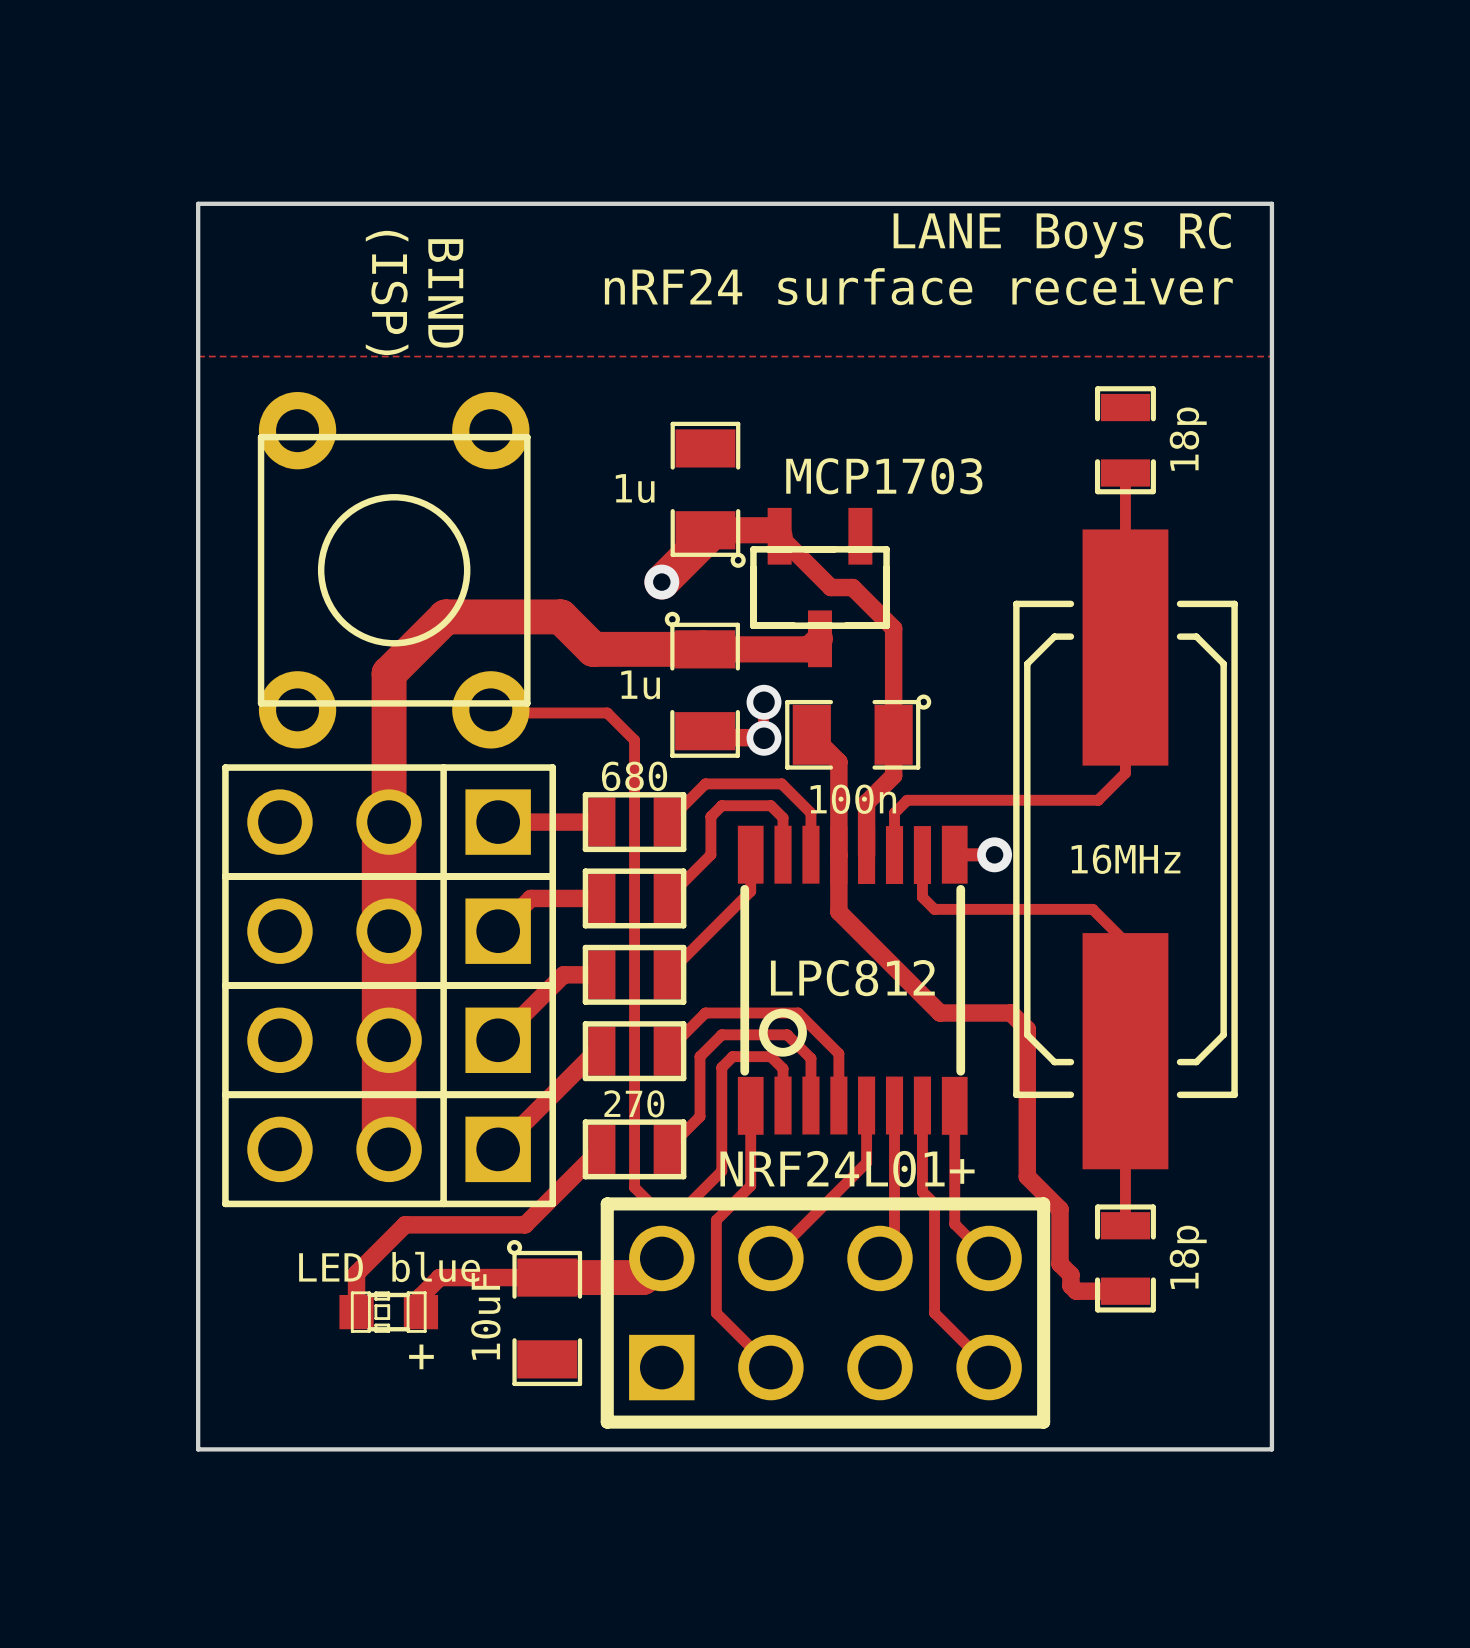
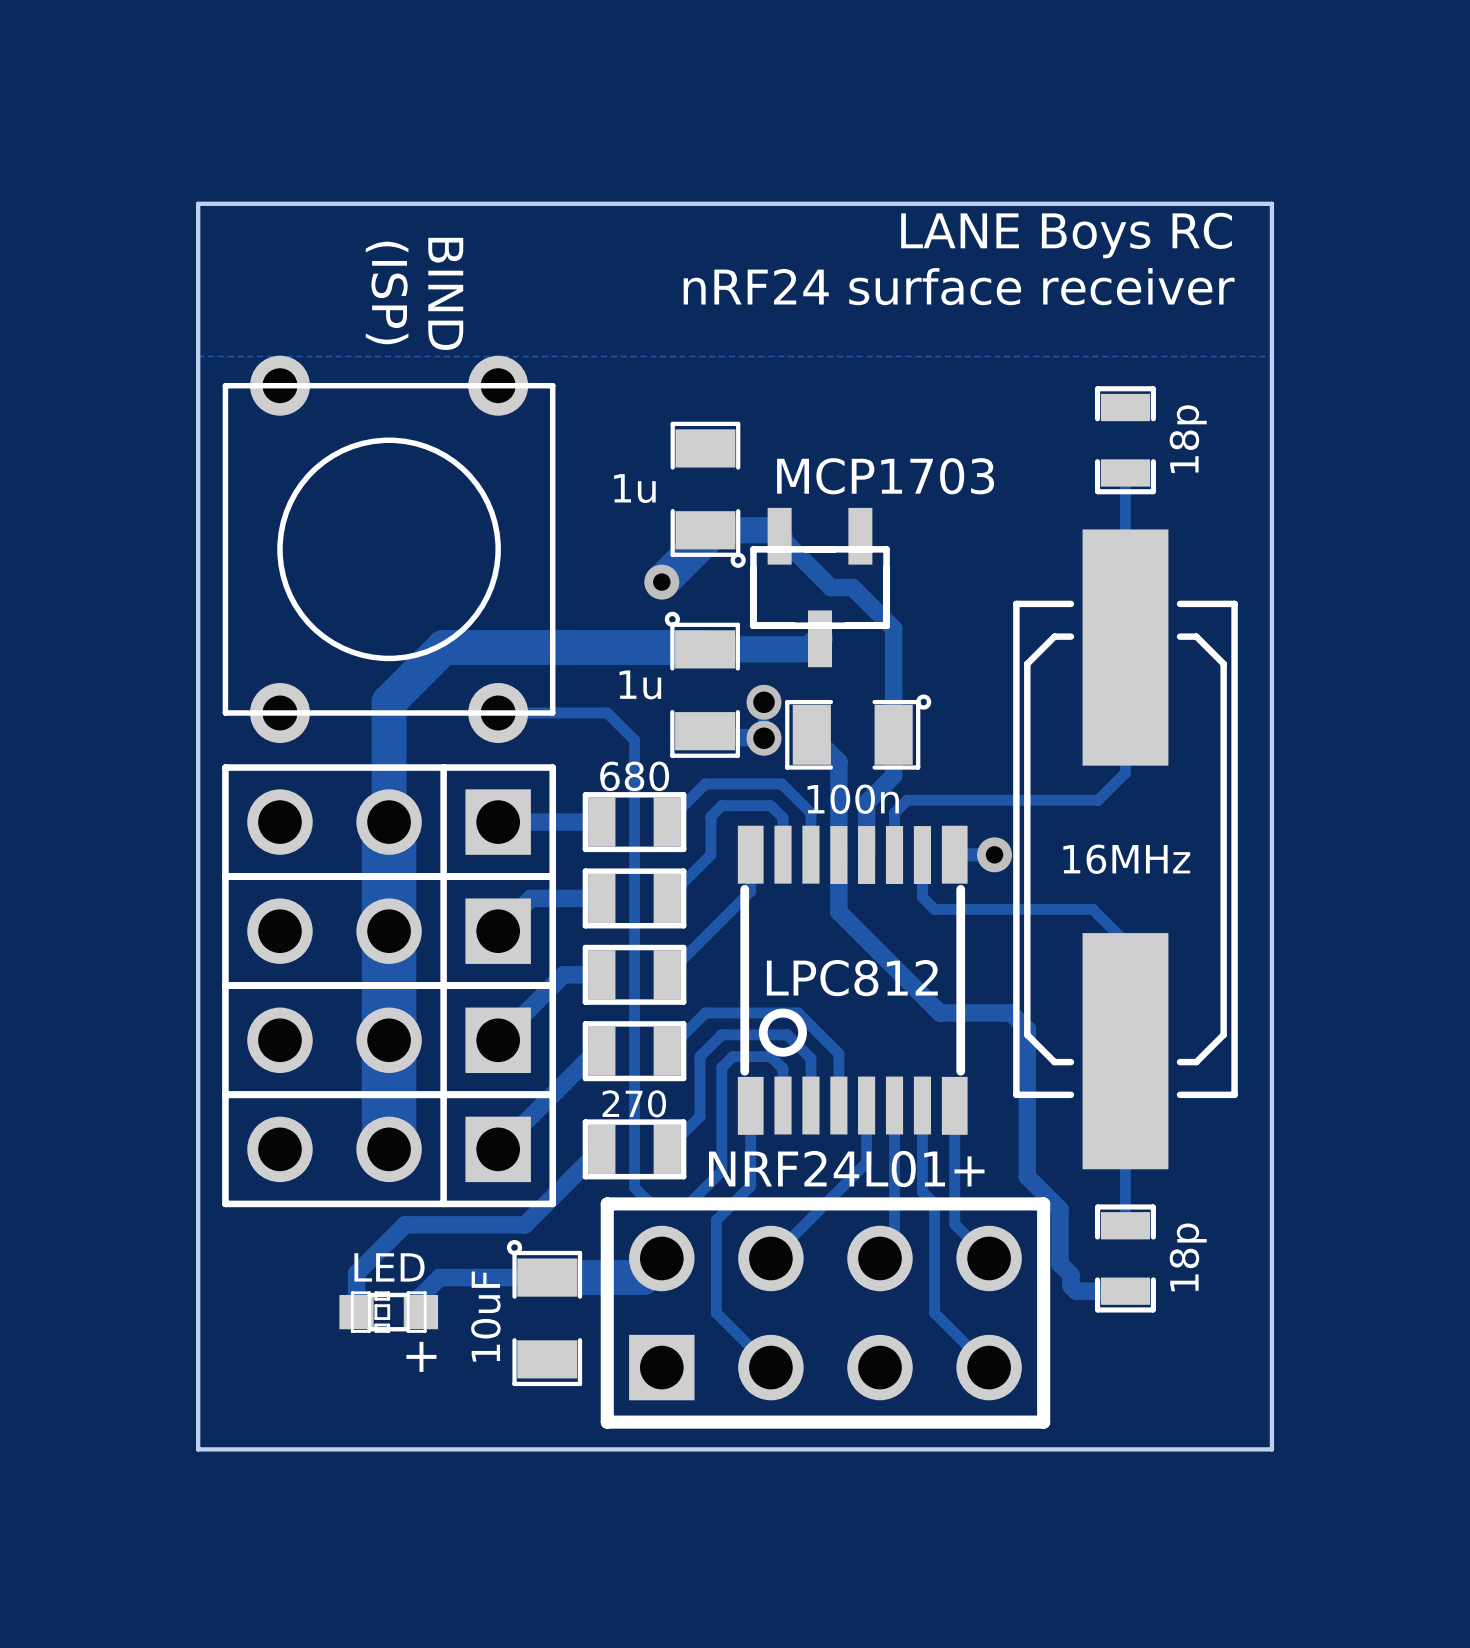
part footprint: [257, 392, 531, 749] -> [222, 355, 556, 743]
track: (705, 649) (593, 649) (560, 616) (445, 616) (389, 673) (389, 702) -> (703, 647) (443, 647) (389, 702)
part value: LED blue (389, 1266) -> LED (389, 1267)

